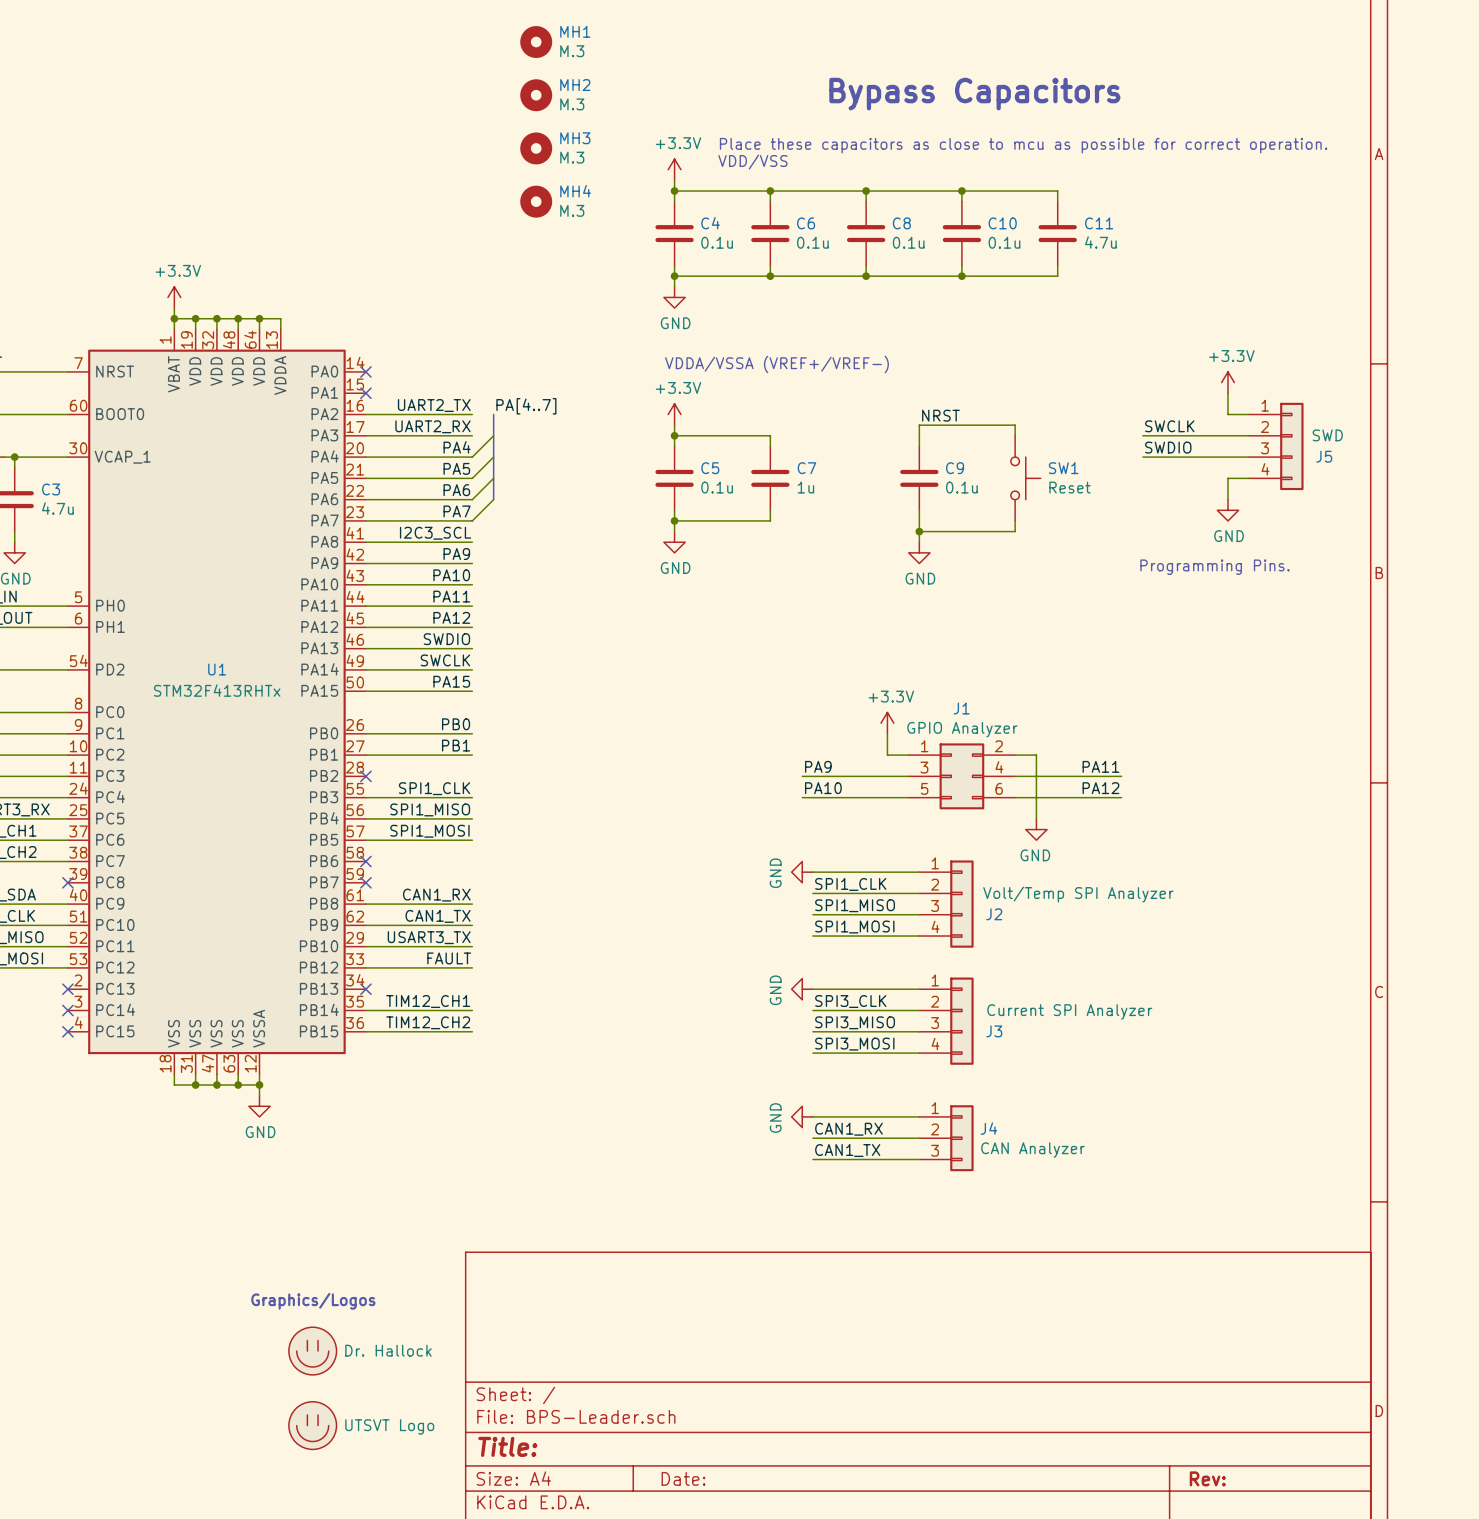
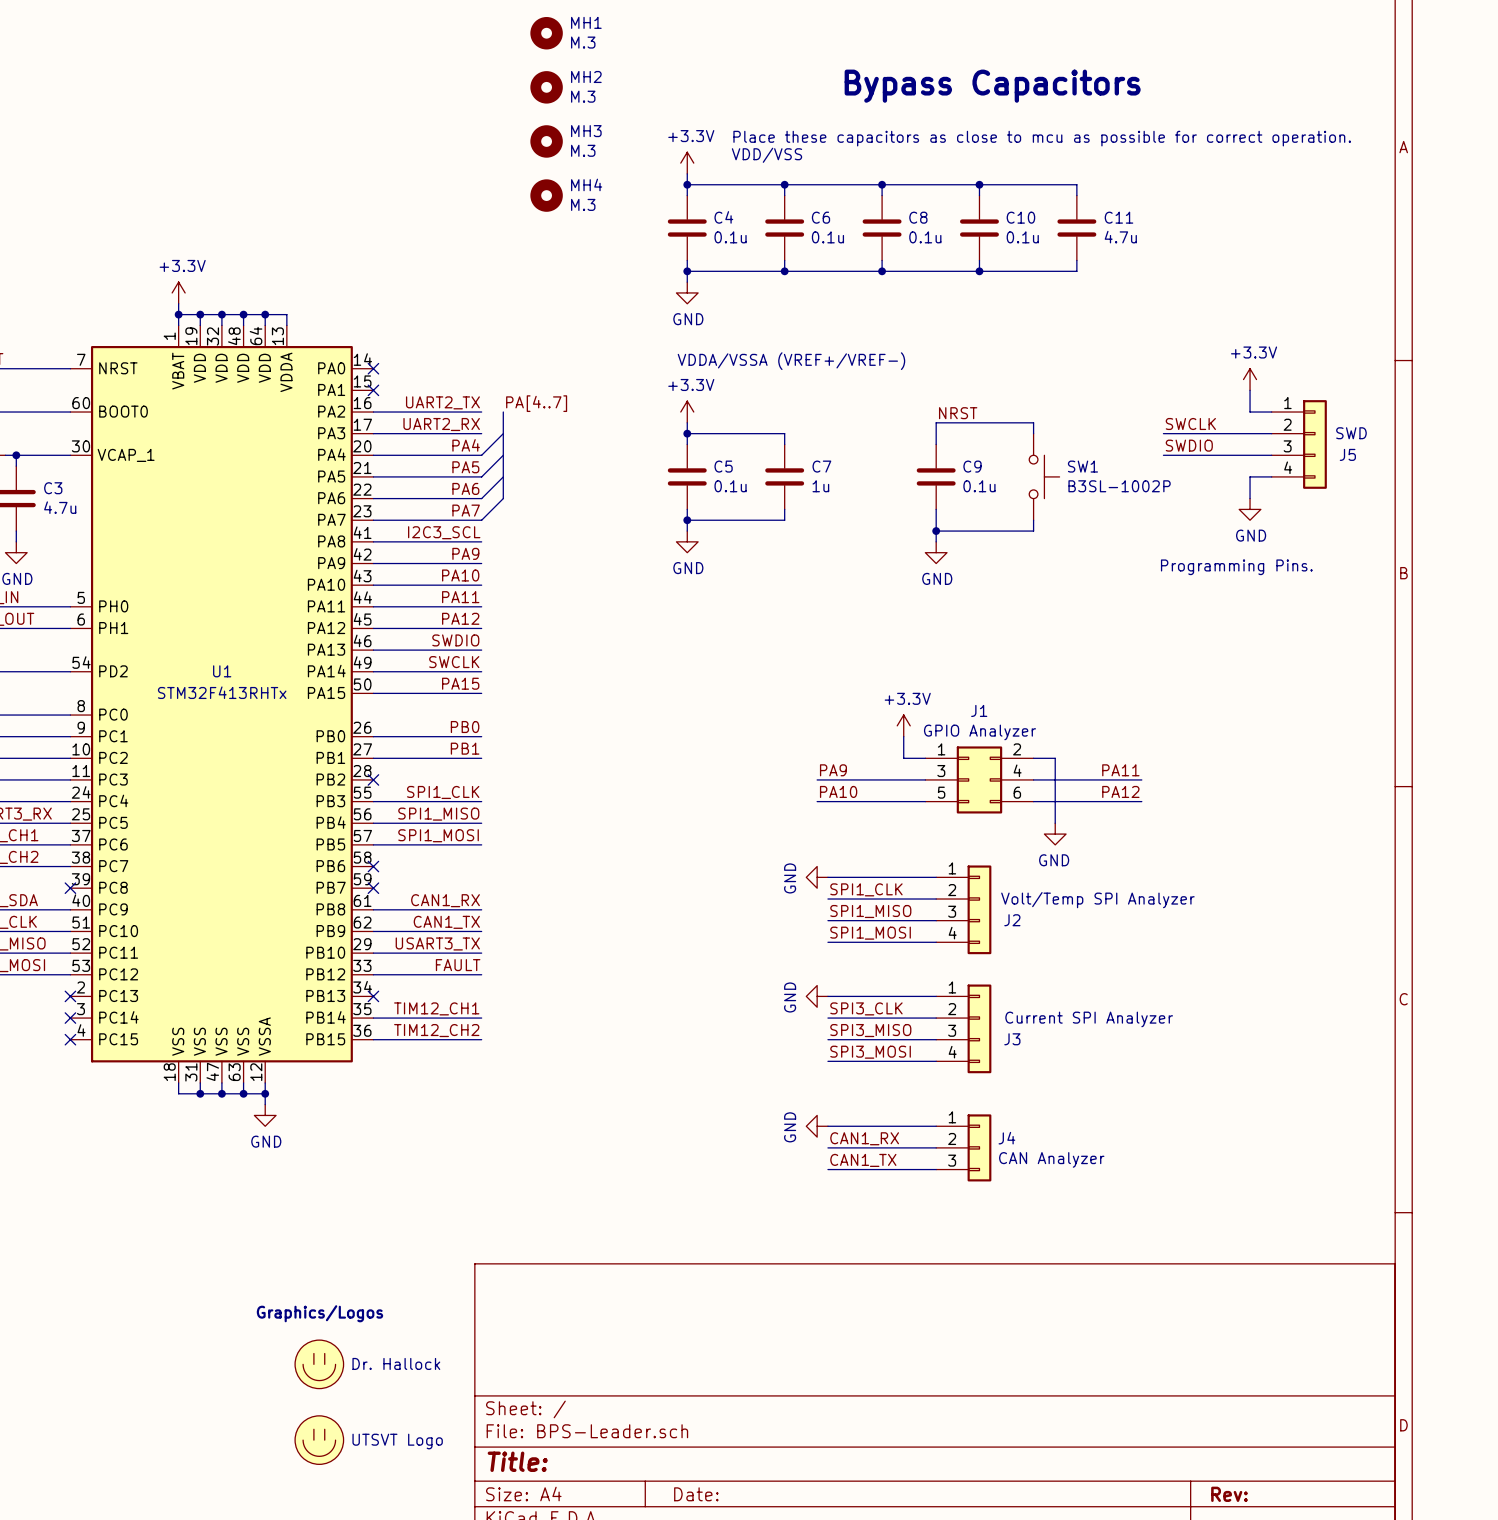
SW1 value: Reset (1070, 487) -> B3SL-1002P (1119, 486)

